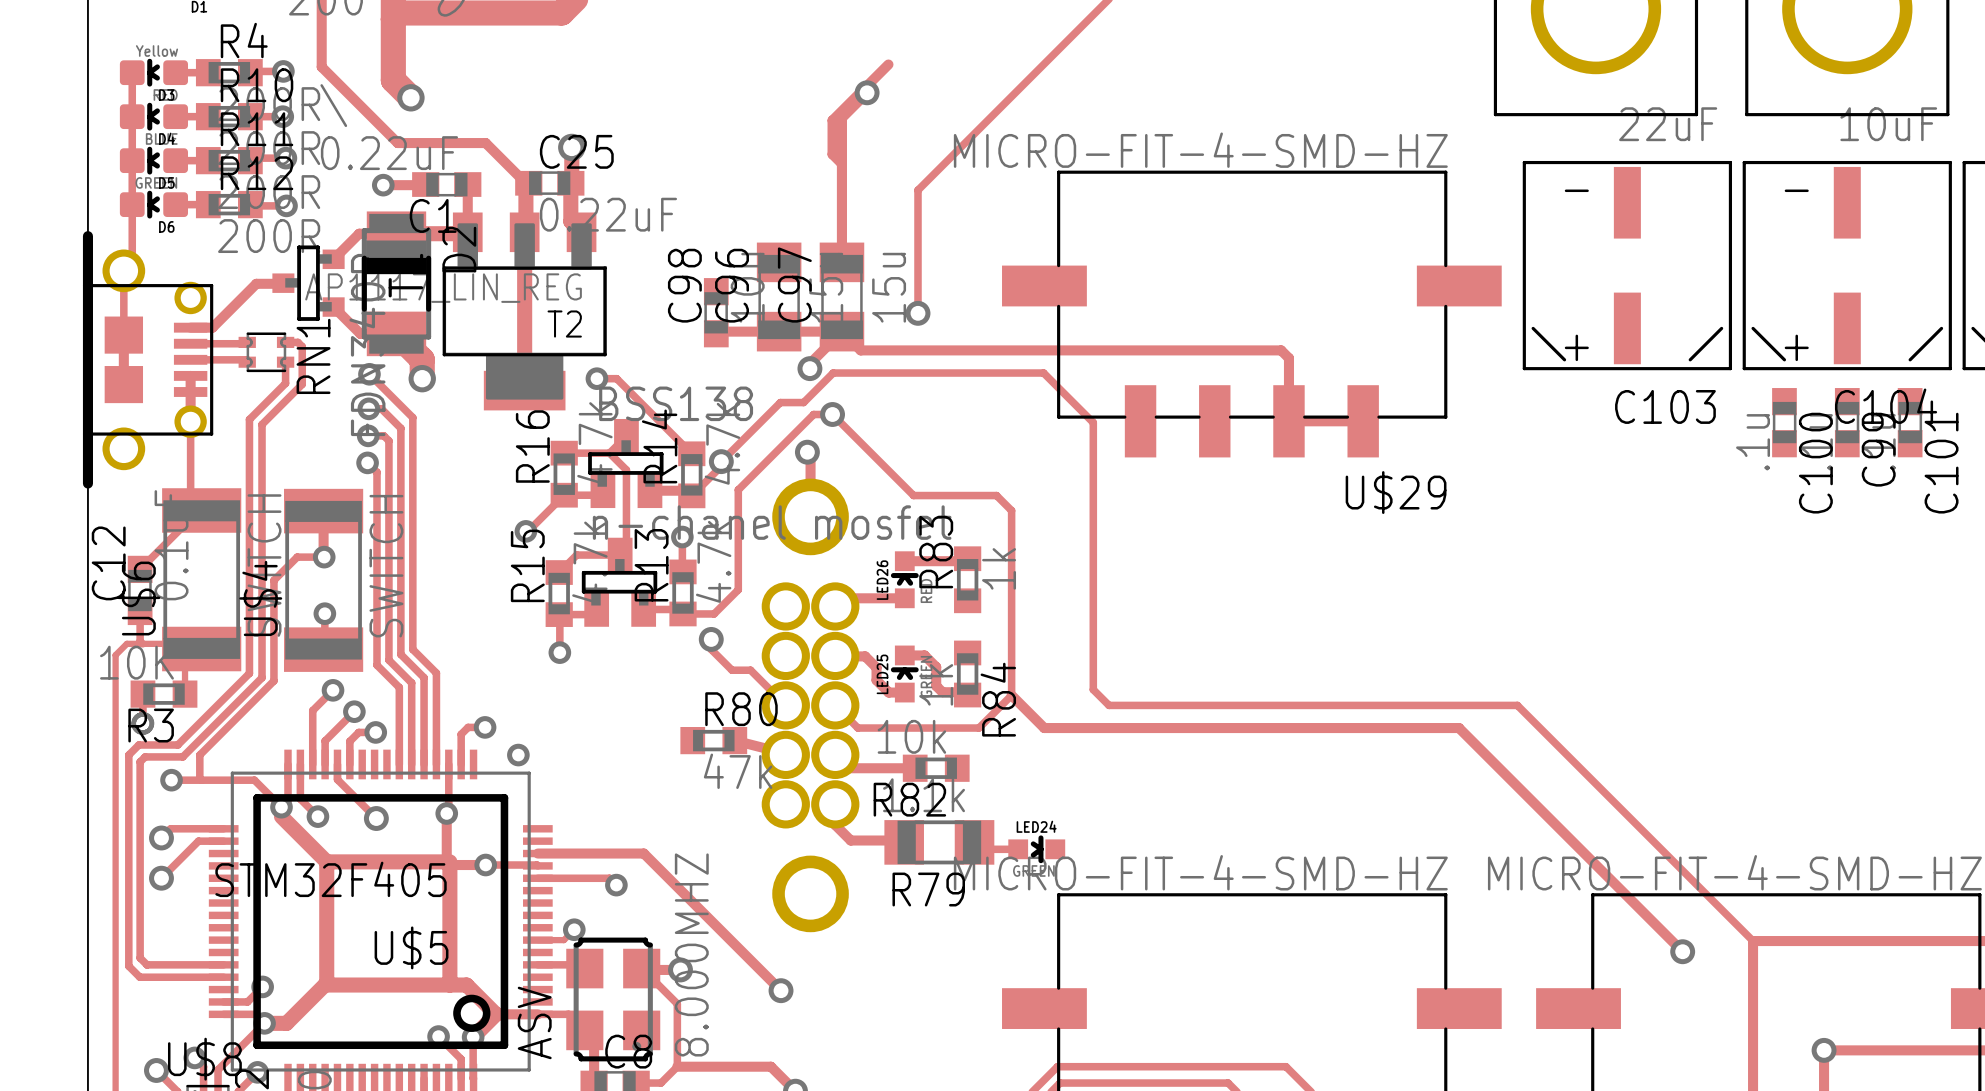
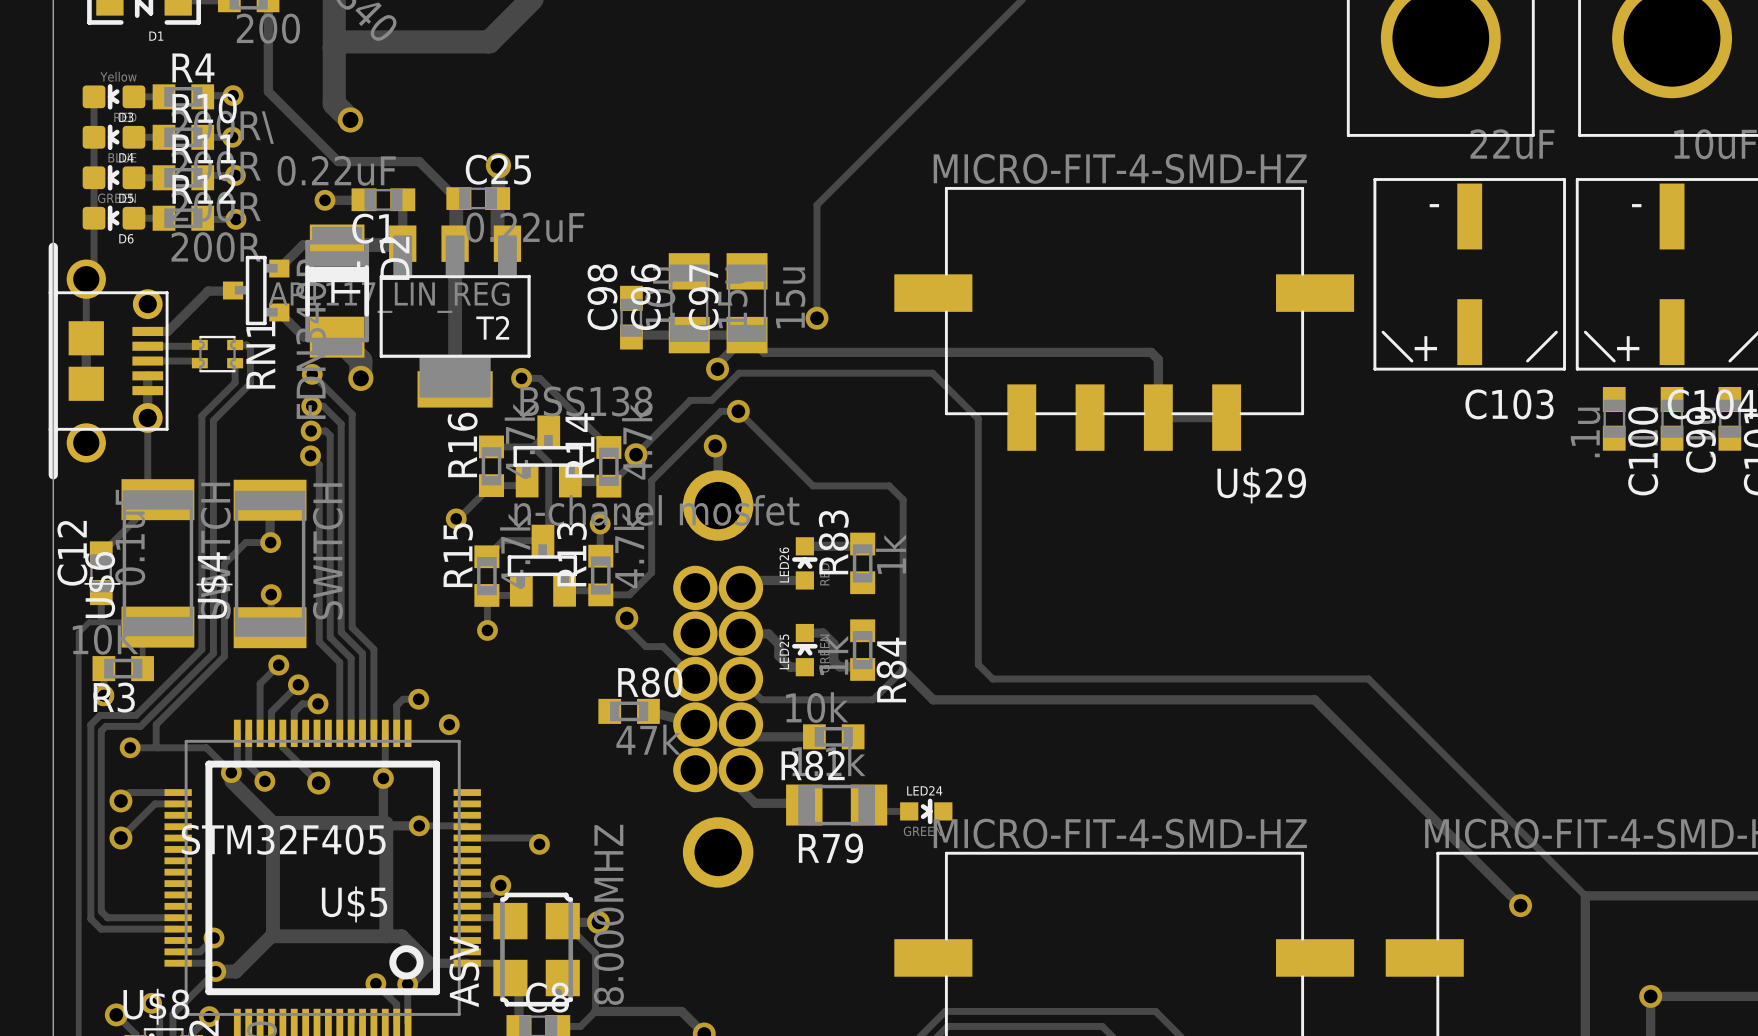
track: (888, 64) (832, 120) (832, 154) (841, 163) -> none
track: (867, 92) (841, 117) (841, 262) -> none
via: (867, 92) -> none
track: (537, 853) (643, 853) (781, 990) -> none
via: (781, 990) -> none

